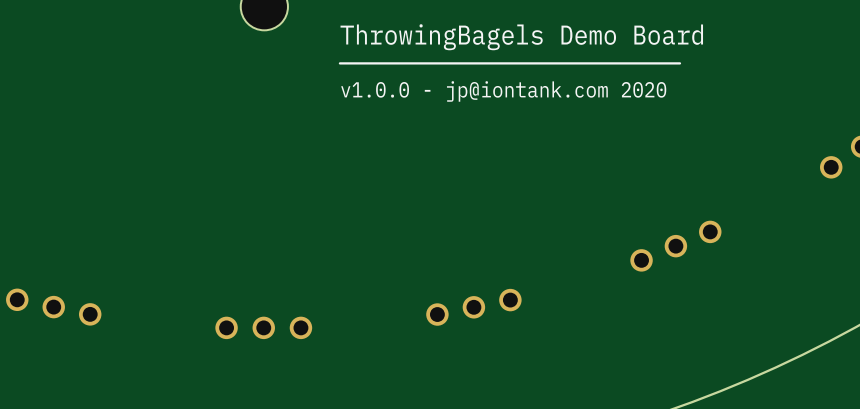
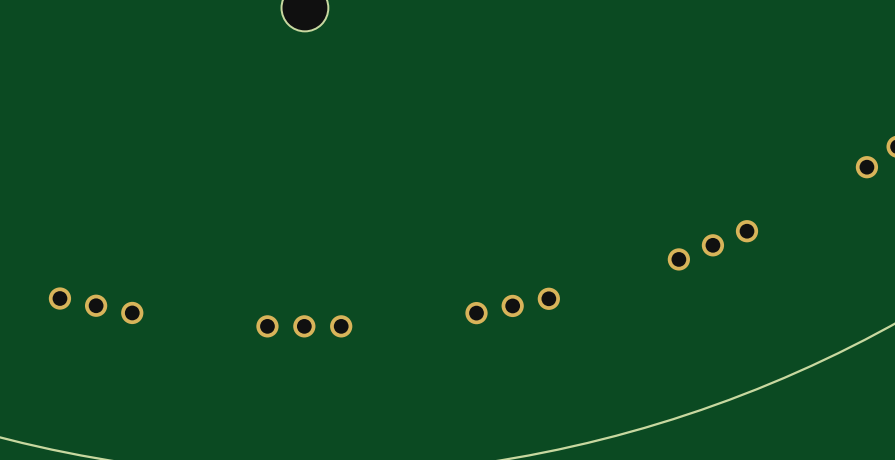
text: ThrowingBagels Demo Board (521, 37) -> none
line: (679, 63) (339, 63) -> none
text: v1.0.0 - jp@iontank.com 2020 (503, 91) -> none

